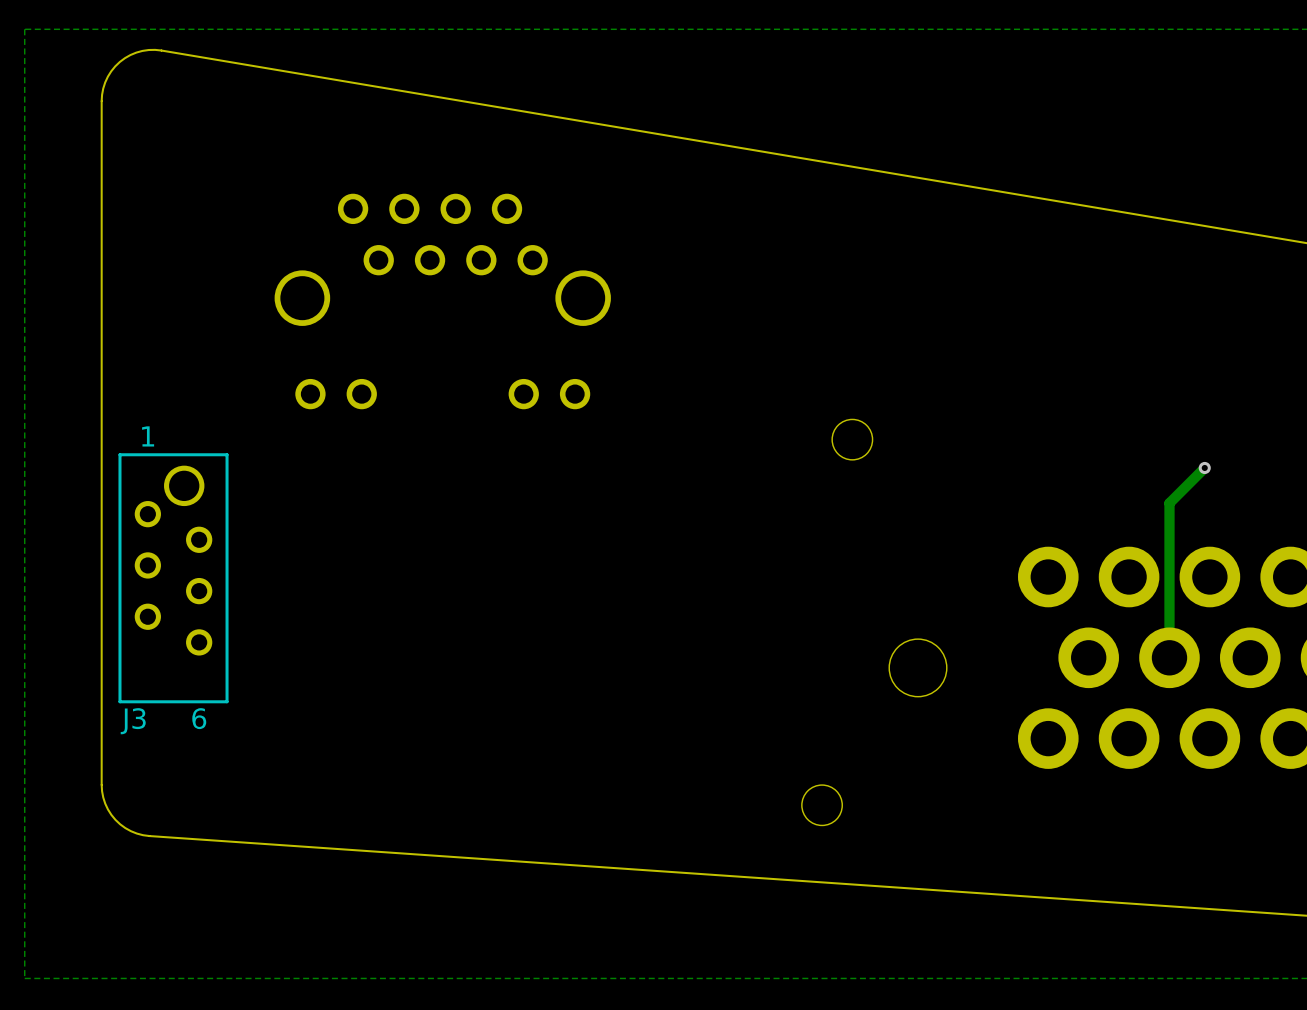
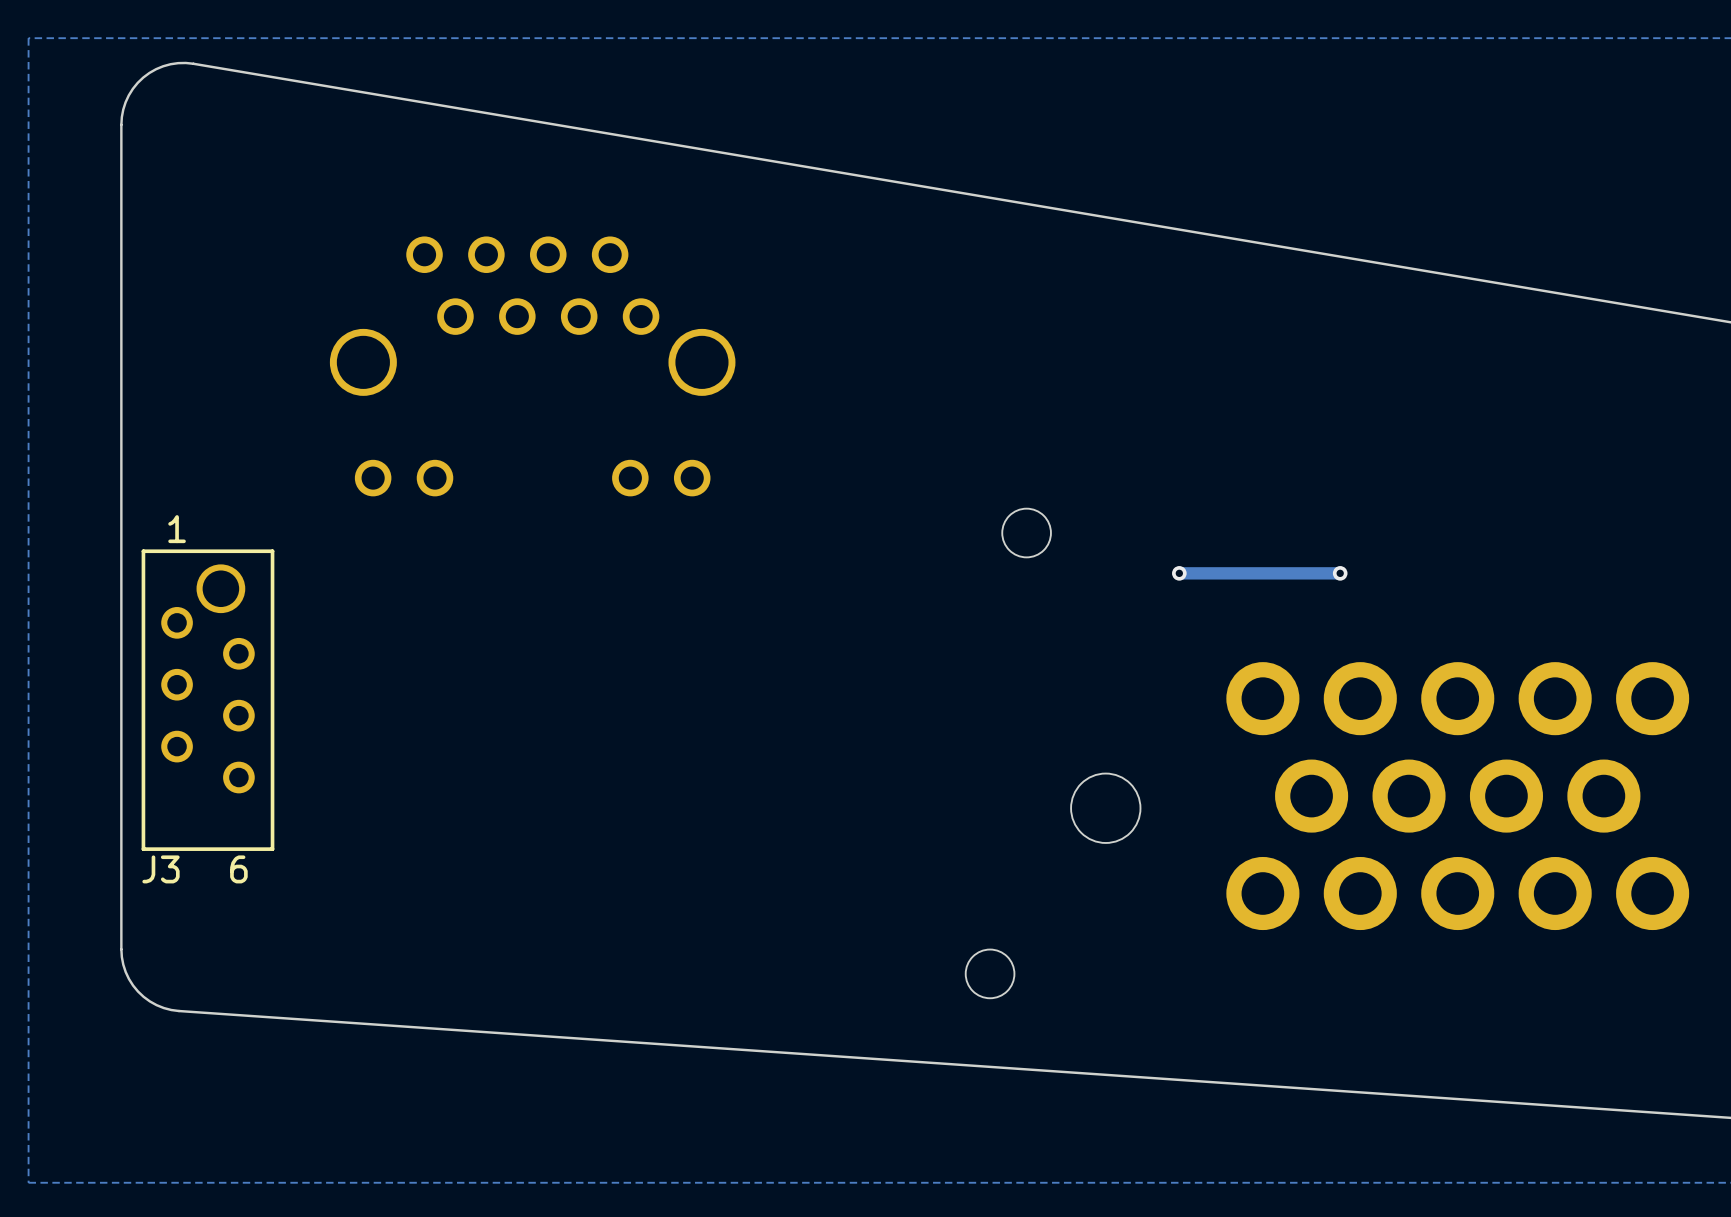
track: (1204, 467) (1169, 503) (1169, 657) -> none
via position: (1204, 467) -> (1340, 573)
via: none -> (1179, 573)
track: none -> (1340, 573) (1179, 573)

